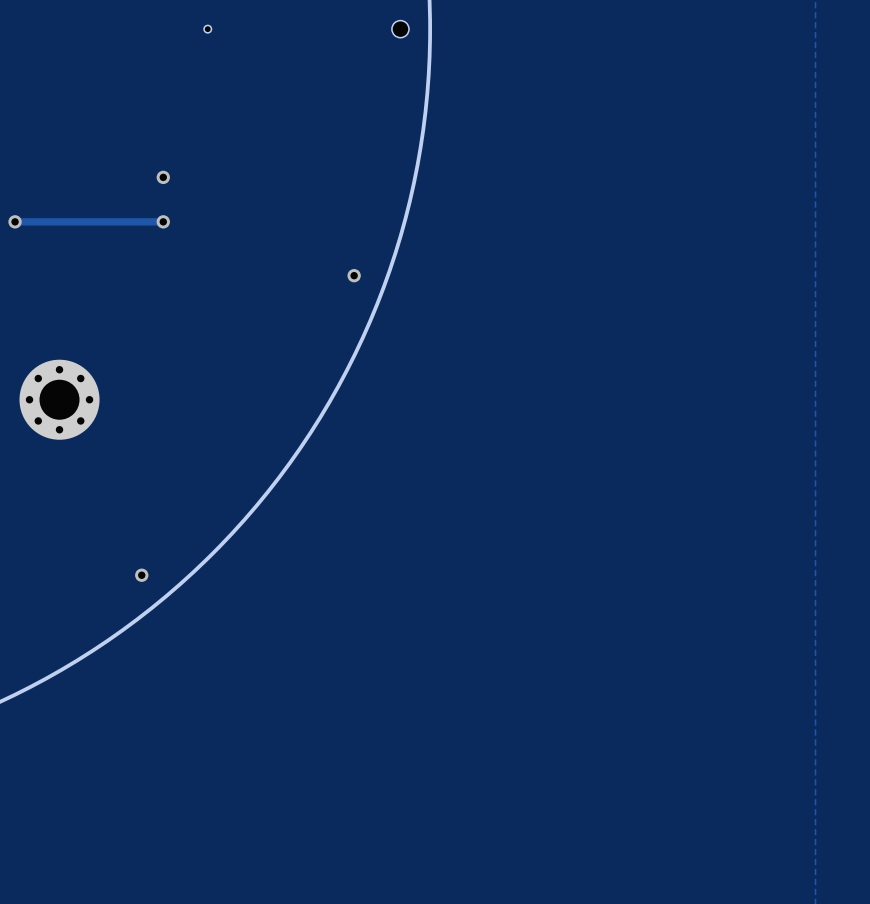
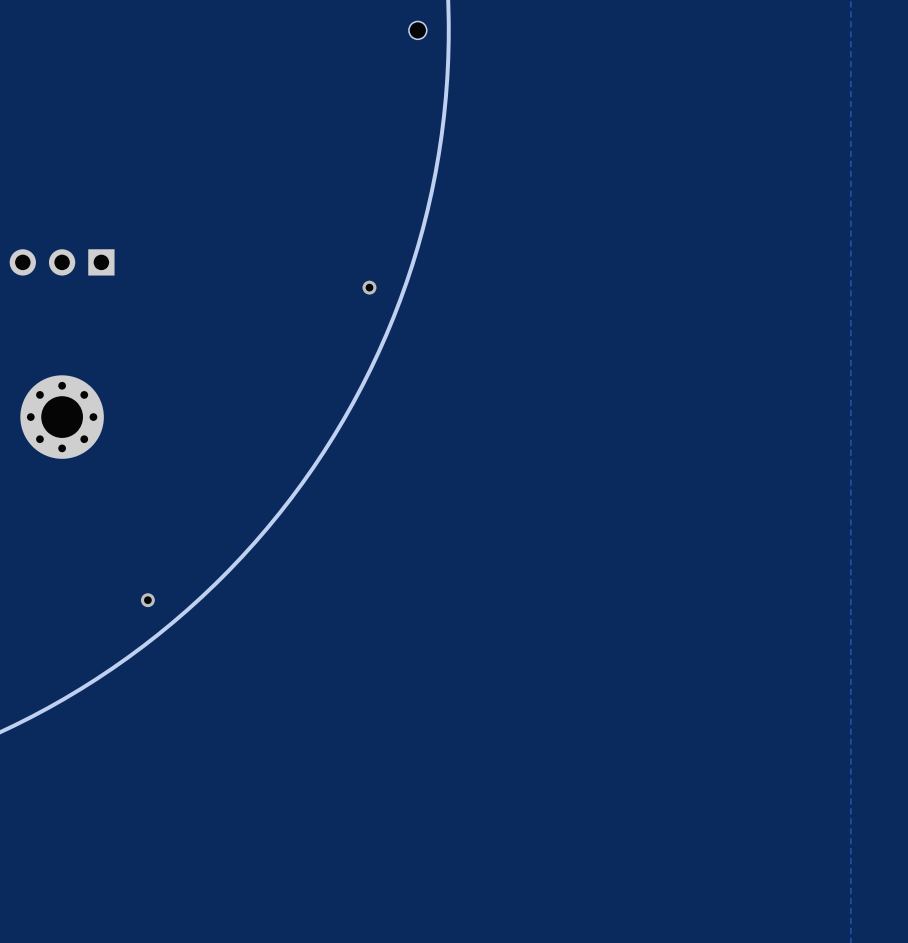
part: (207, 29) -> none
via: (163, 177) -> none
via: (15, 221) -> none
track: (163, 221) (15, 221) -> none
via: (163, 221) -> none
part: none -> (62, 262)

